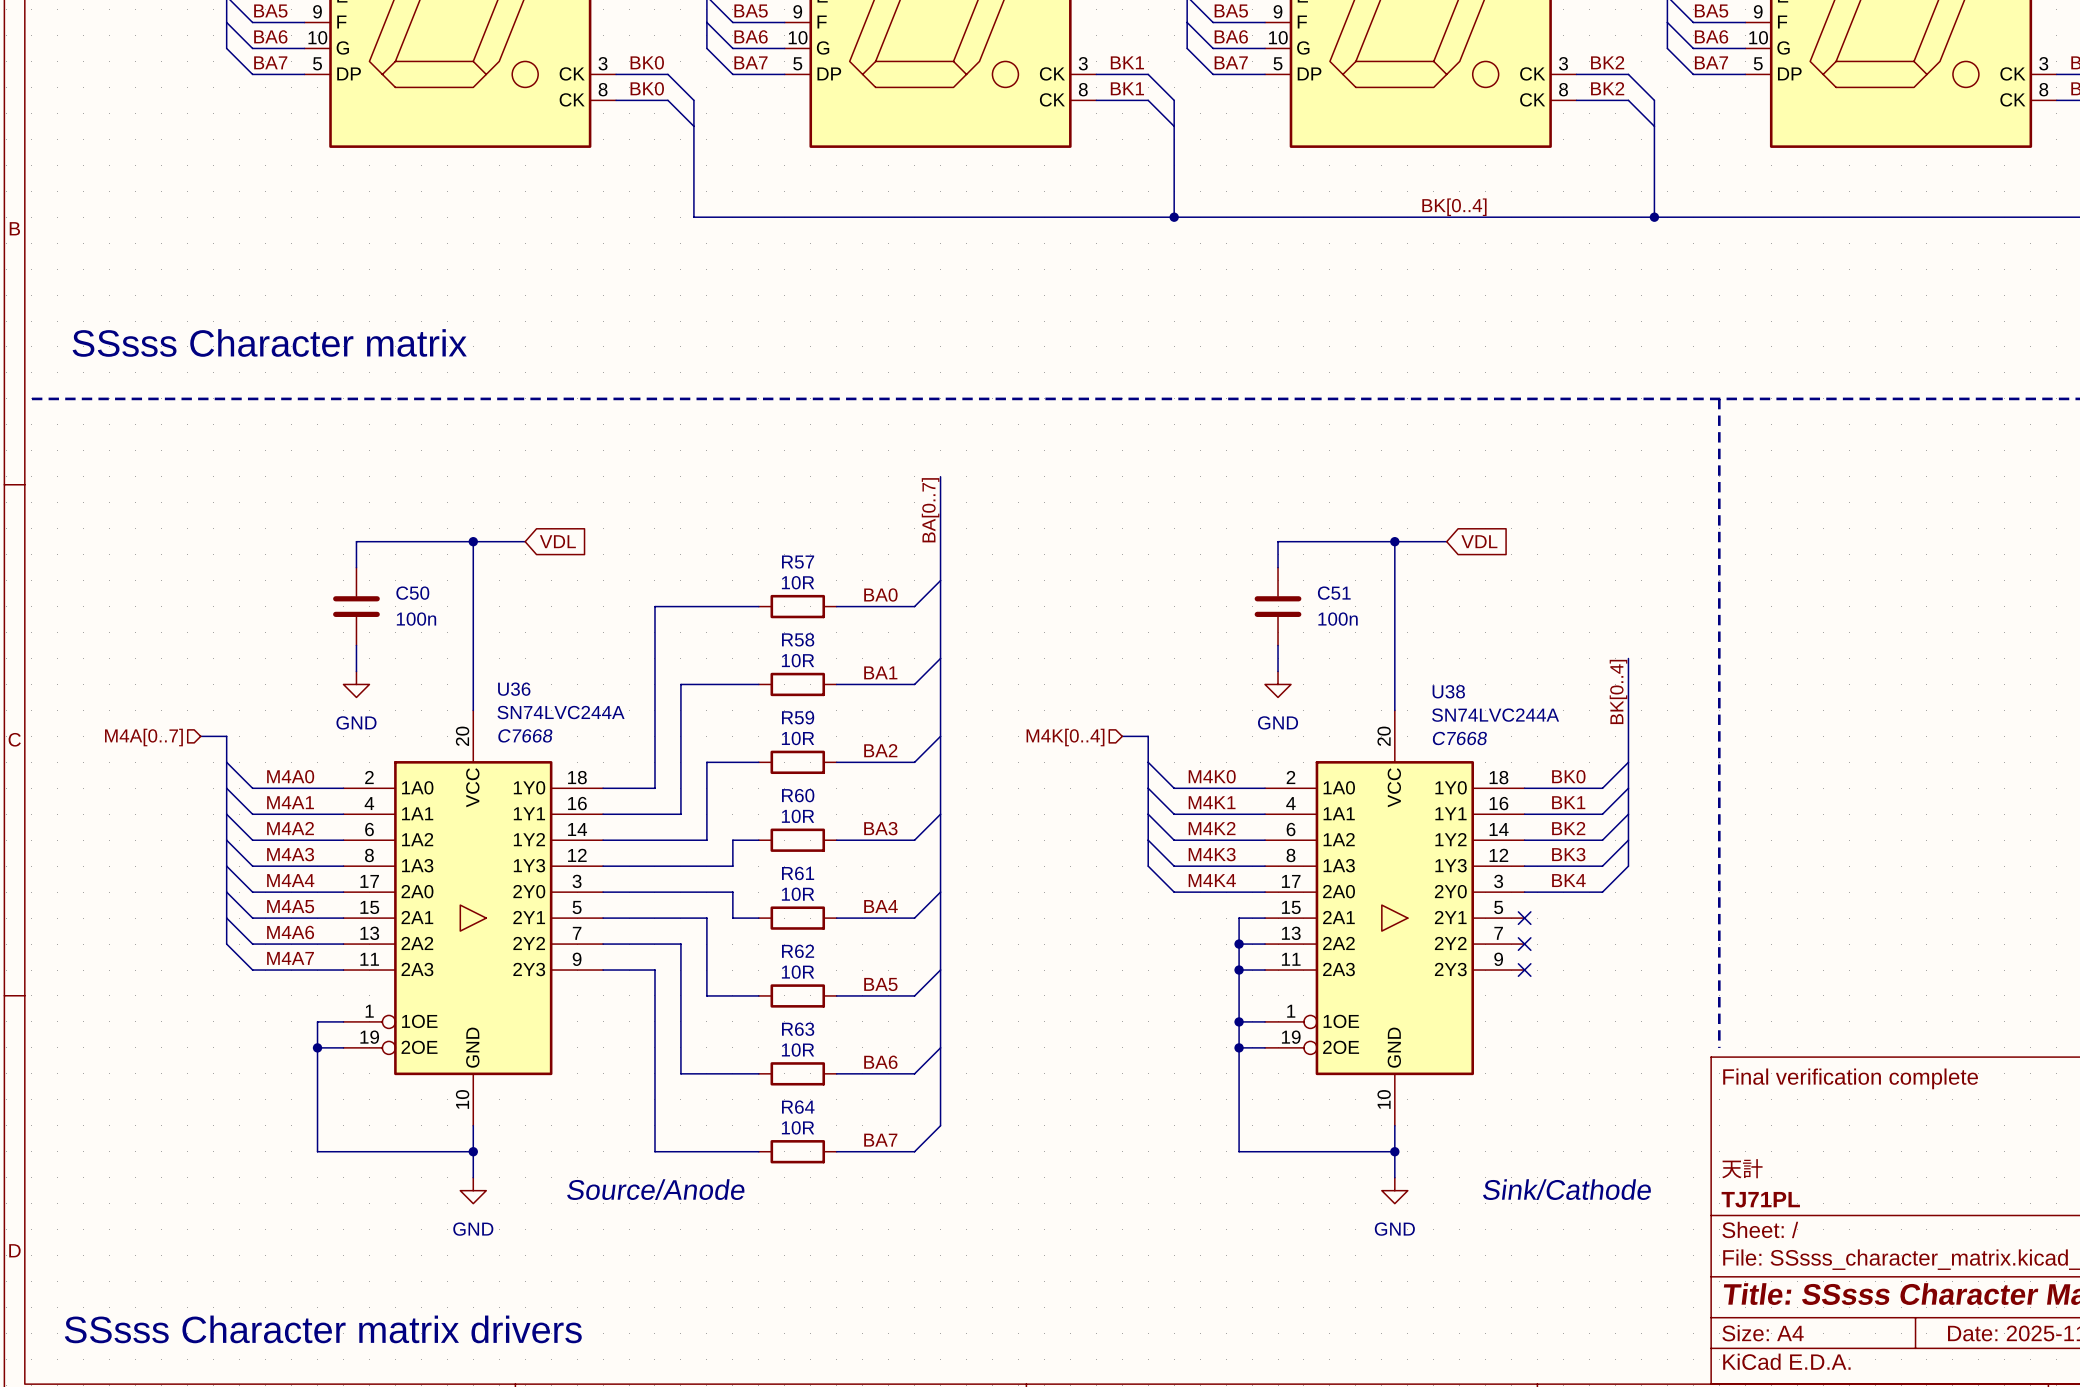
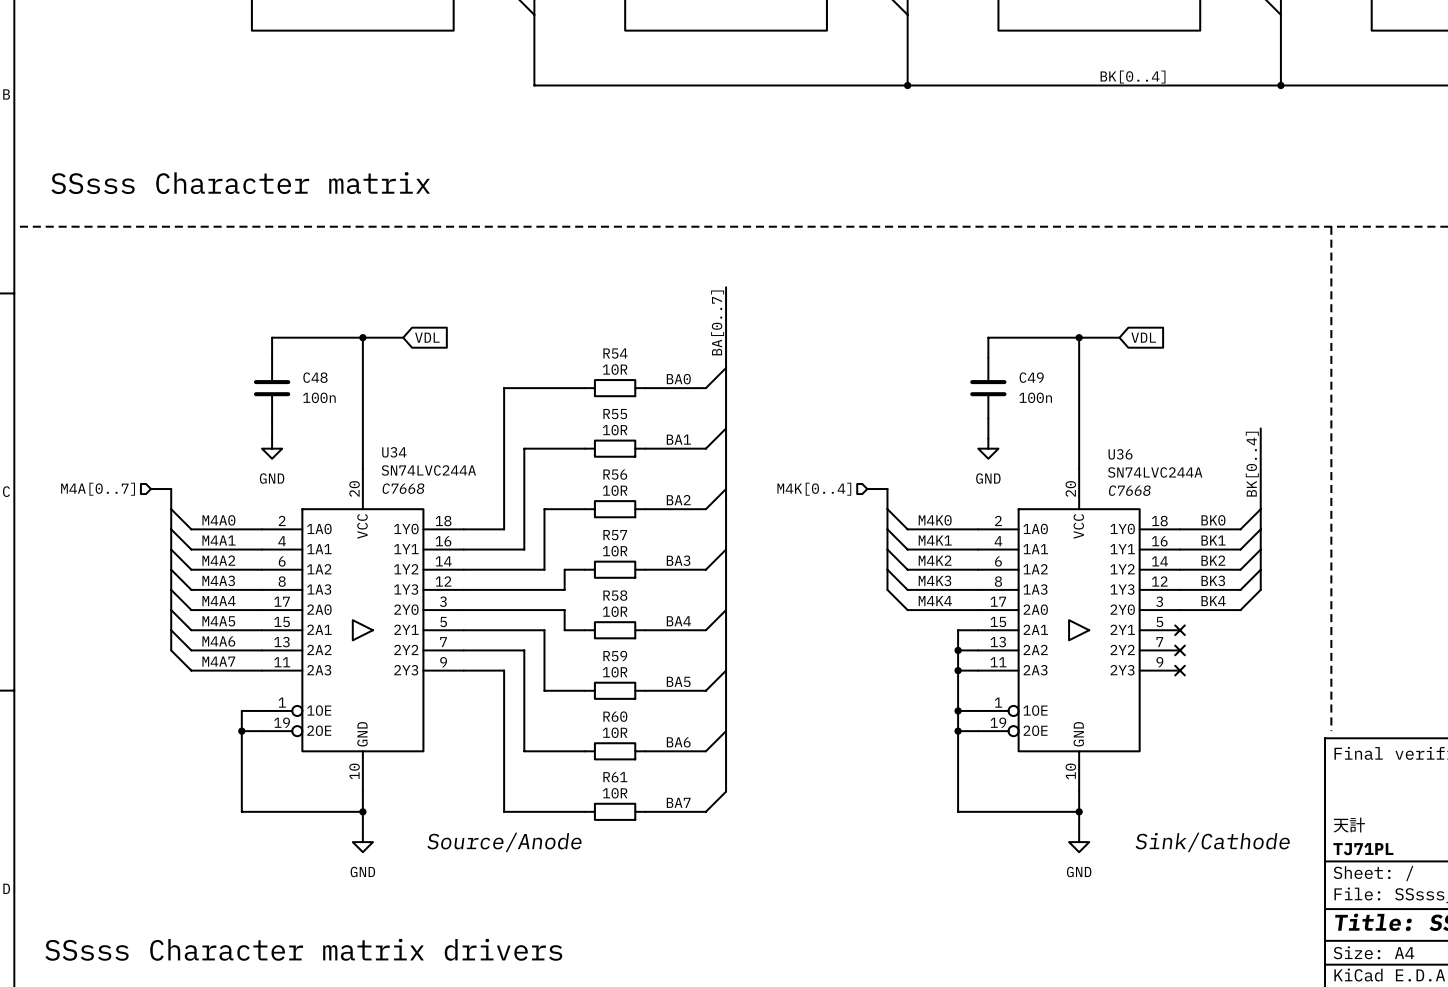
R57 name: R57 (798, 562) -> R54 (615, 353)
C50 name: C50 (412, 593) -> C48 (315, 377)
C51 name: C51 (1334, 593) -> C49 (1031, 377)
R58 name: R58 (798, 639) -> R55 (615, 414)
U36 name: U36 (514, 689) -> U34 (394, 452)
U38 name: U38 (1448, 691) -> U36 (1120, 454)
R59 name: R59 (798, 717) -> R56 (615, 474)
R60 name: R60 (798, 795) -> R57 (615, 535)
R61 name: R61 (798, 873) -> R58 (615, 595)
R62 name: R62 (798, 951) -> R59 (615, 656)
R63 name: R63 (798, 1029) -> R60 (615, 716)
R64 name: R64 (798, 1107) -> R61 (615, 777)

